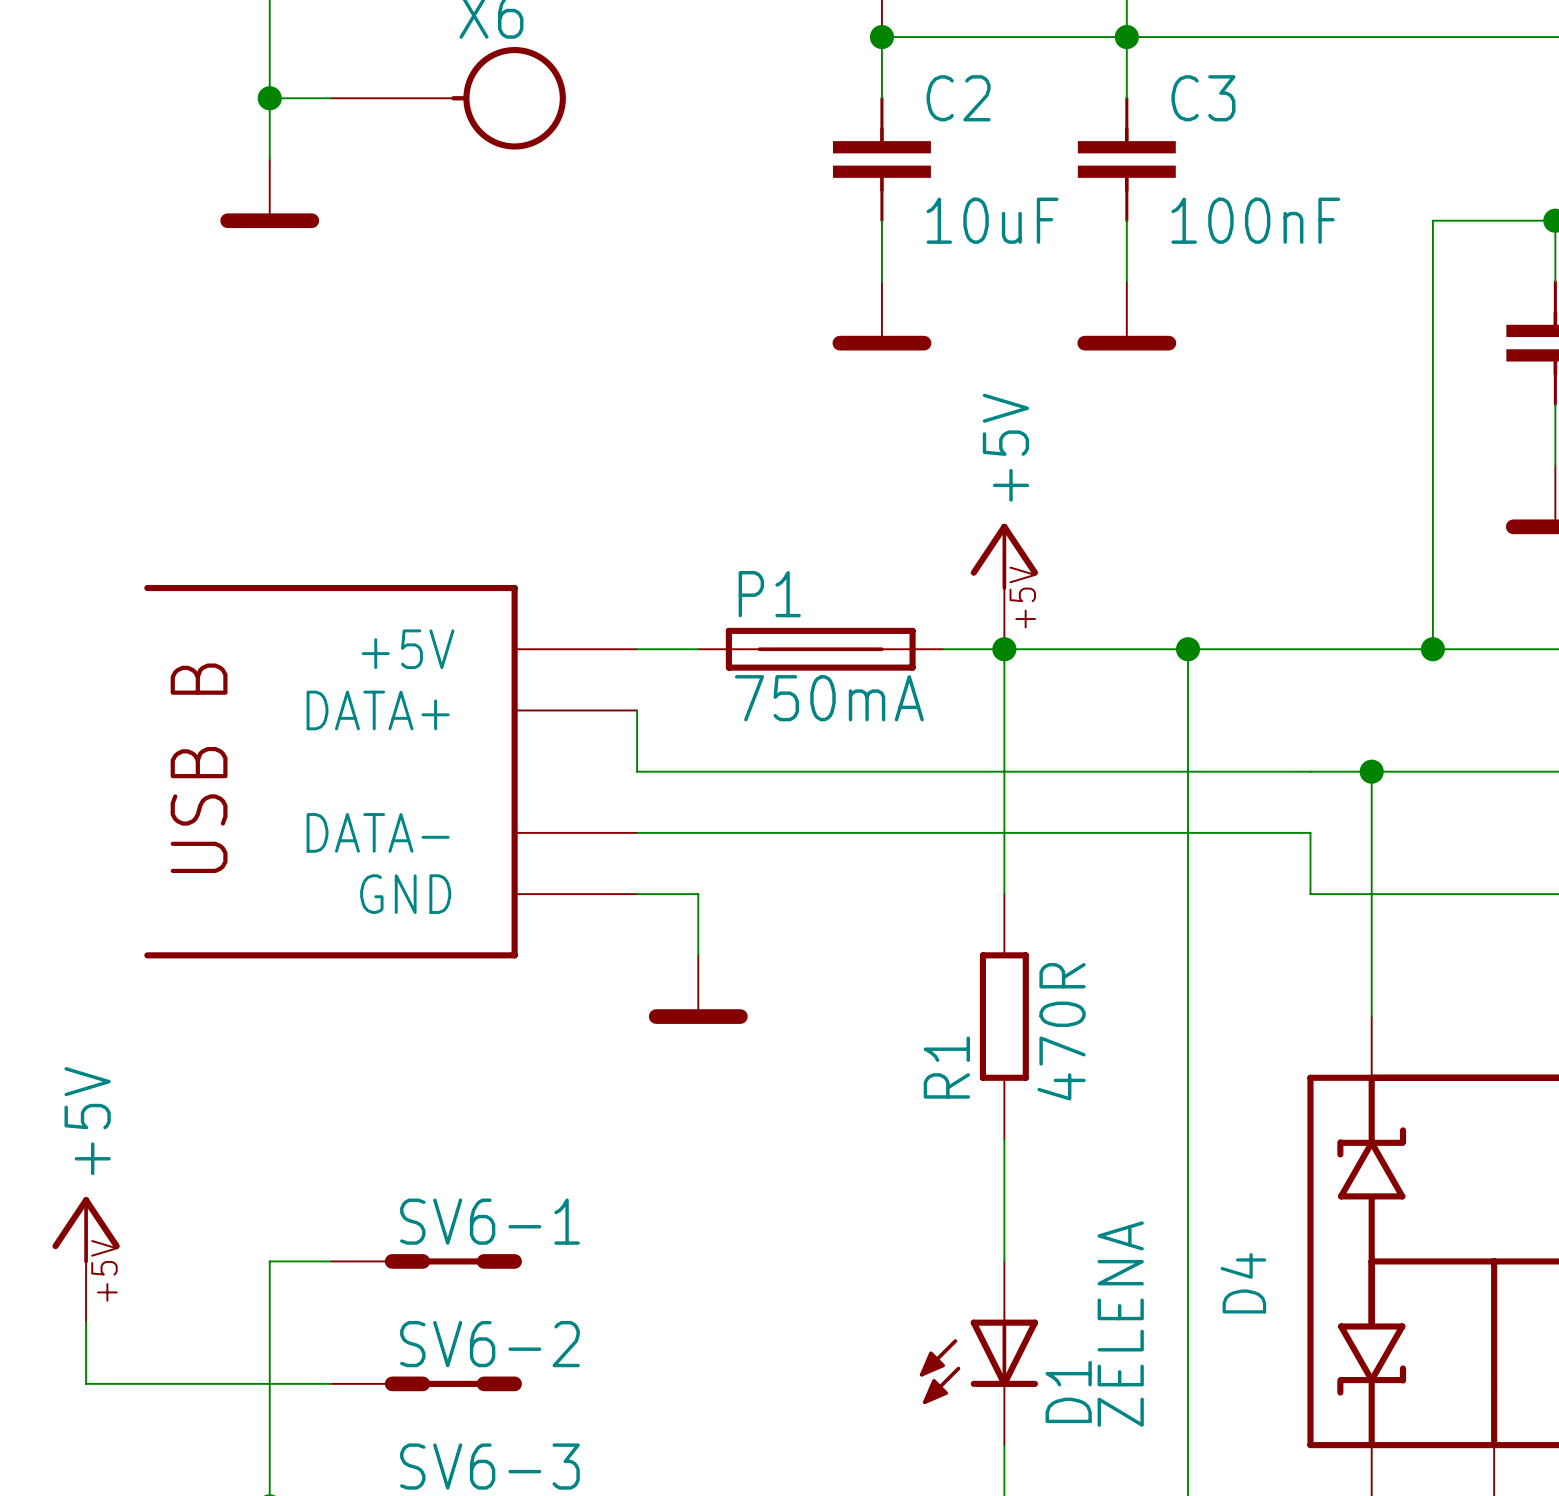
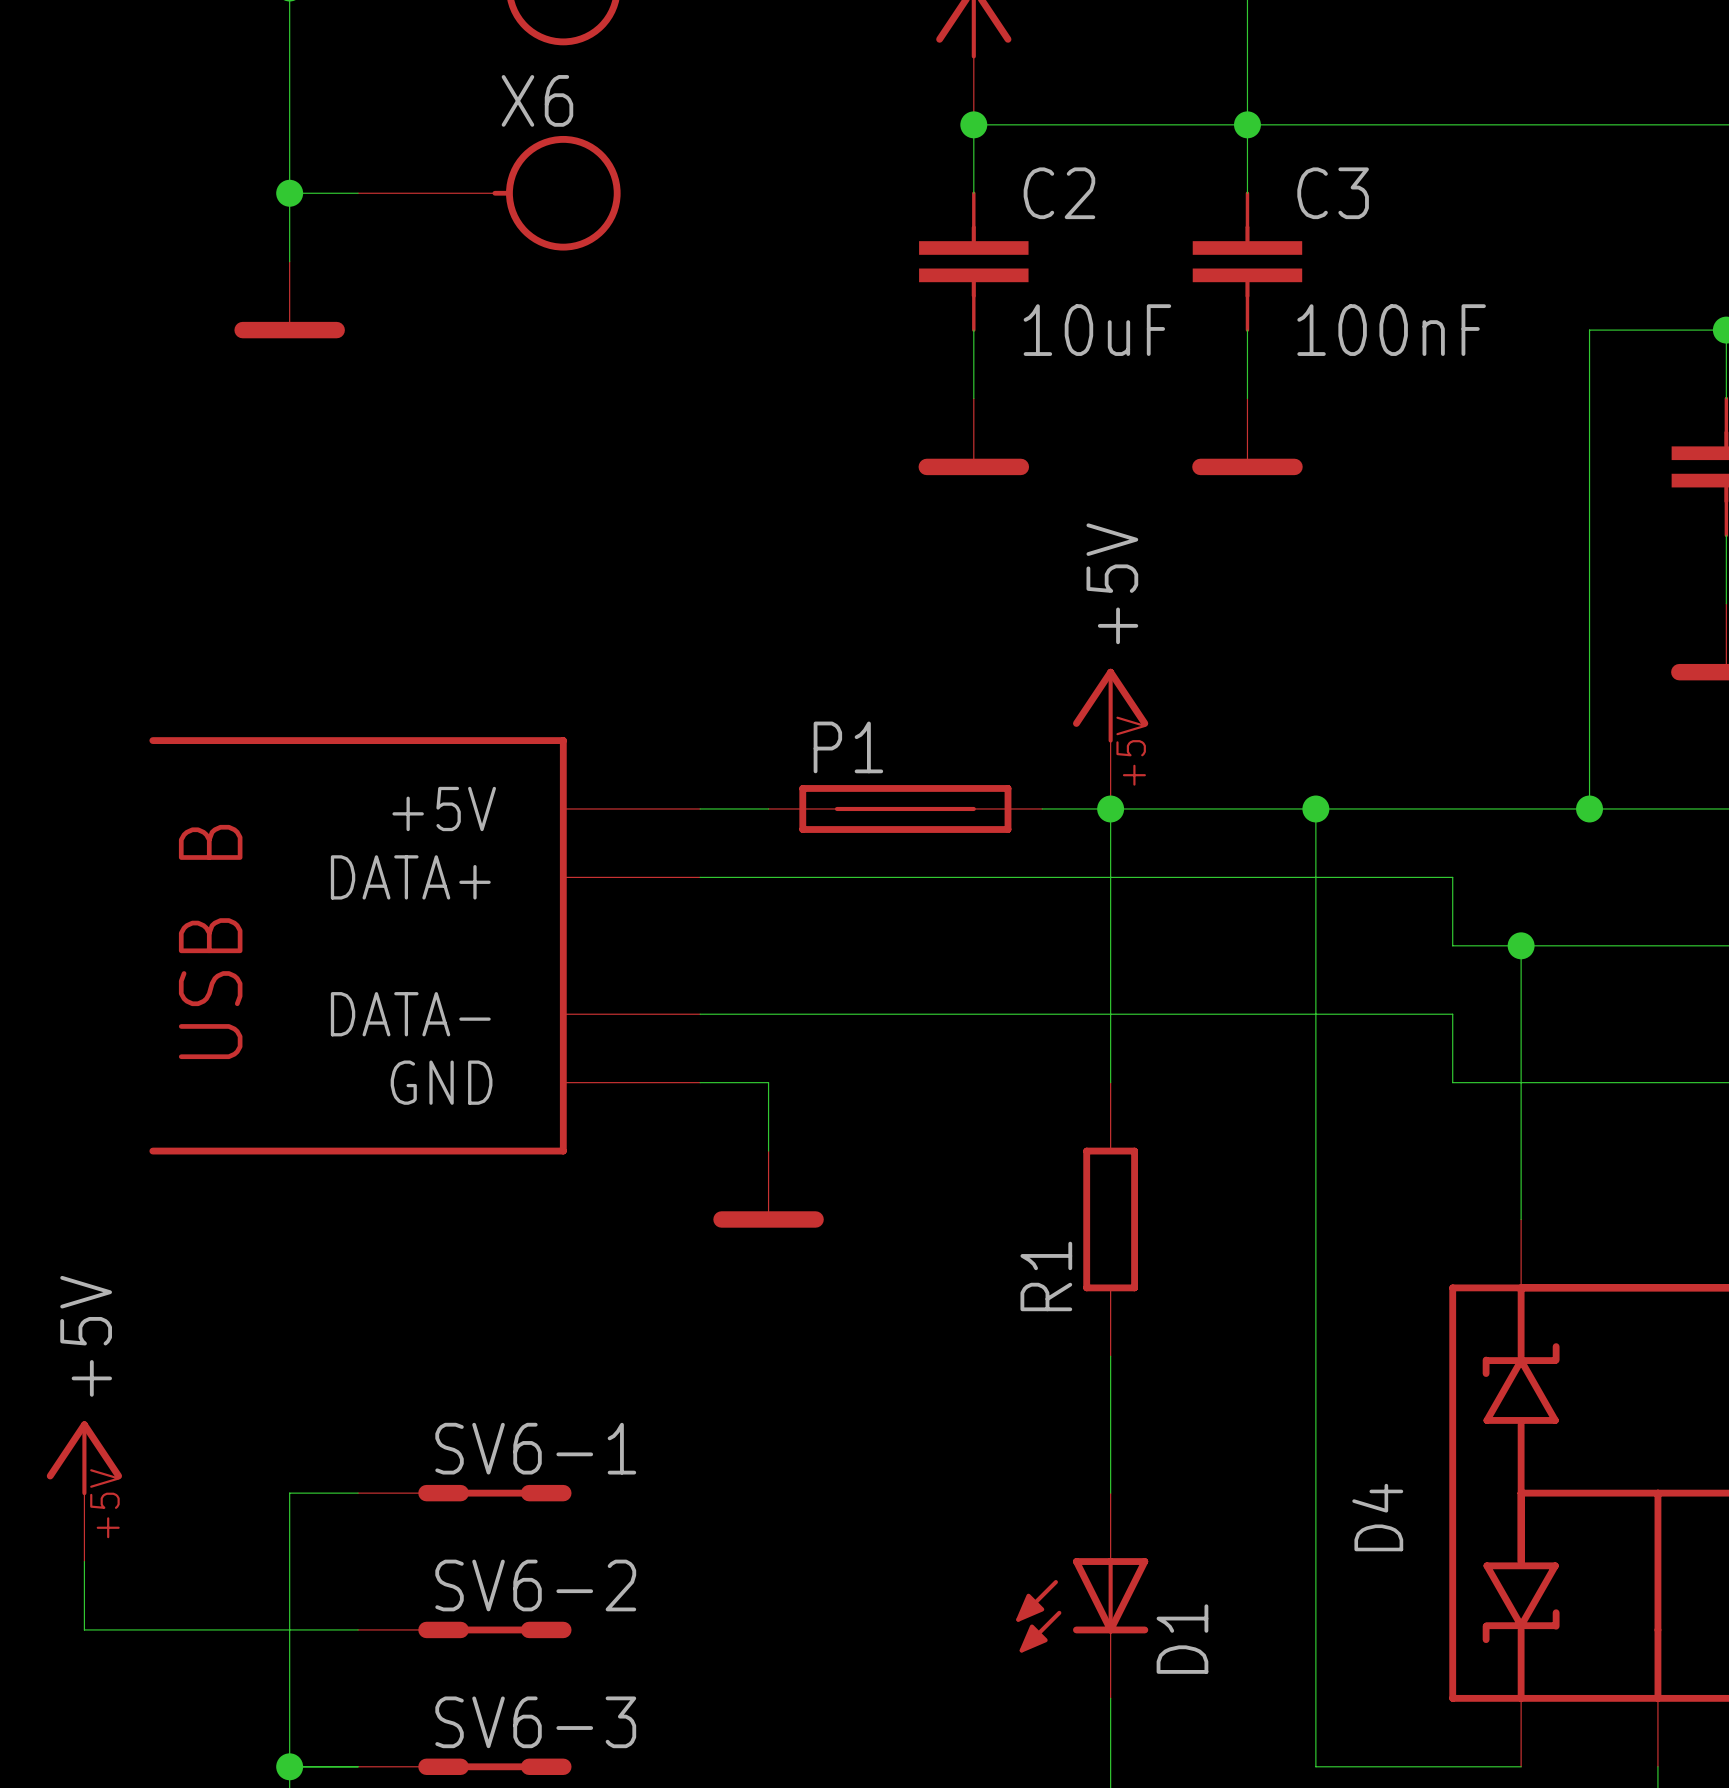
P1 value: 750mA (829, 698) -> none
wire: (637, 710) (637, 771) (1310, 771) -> (700, 877) (1452, 877) (1452, 945)
R1 value: 470R (1061, 1031) -> none
D1 value: ZELENA (1120, 1324) -> none

